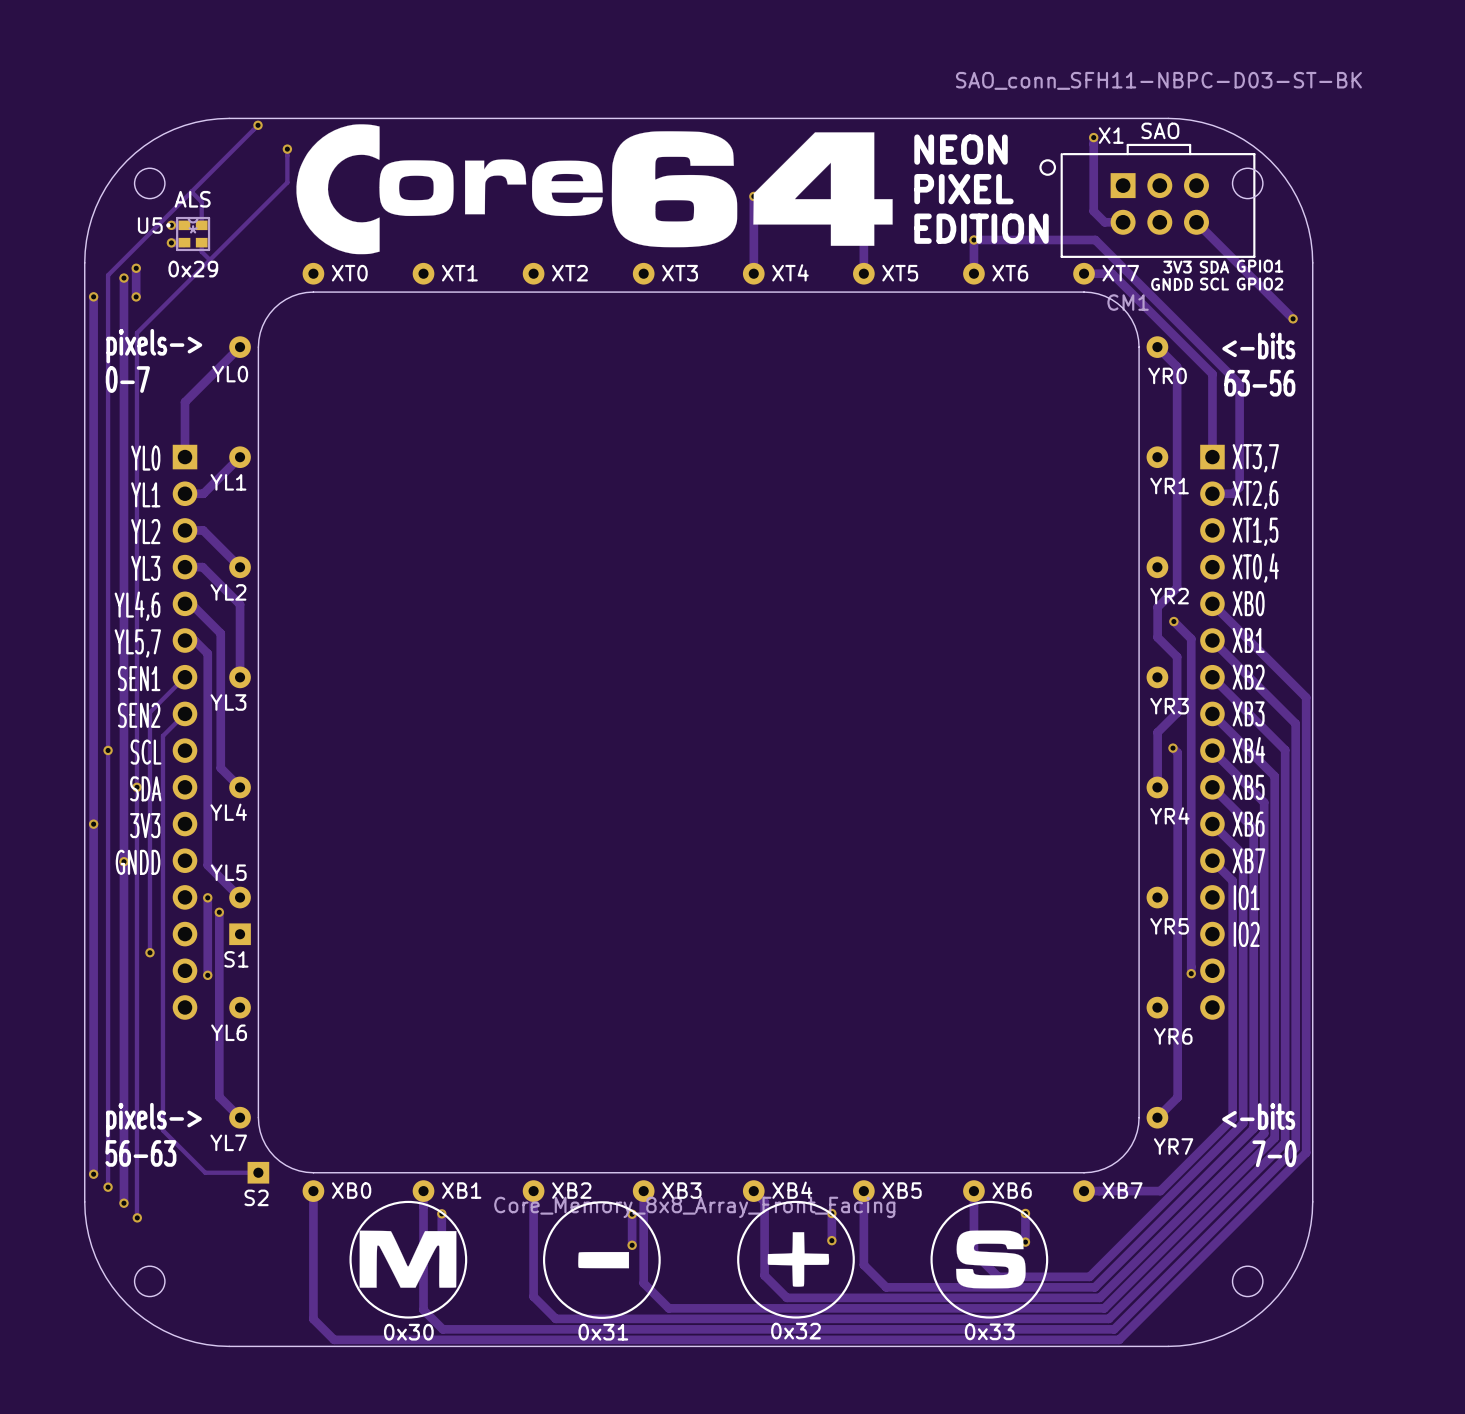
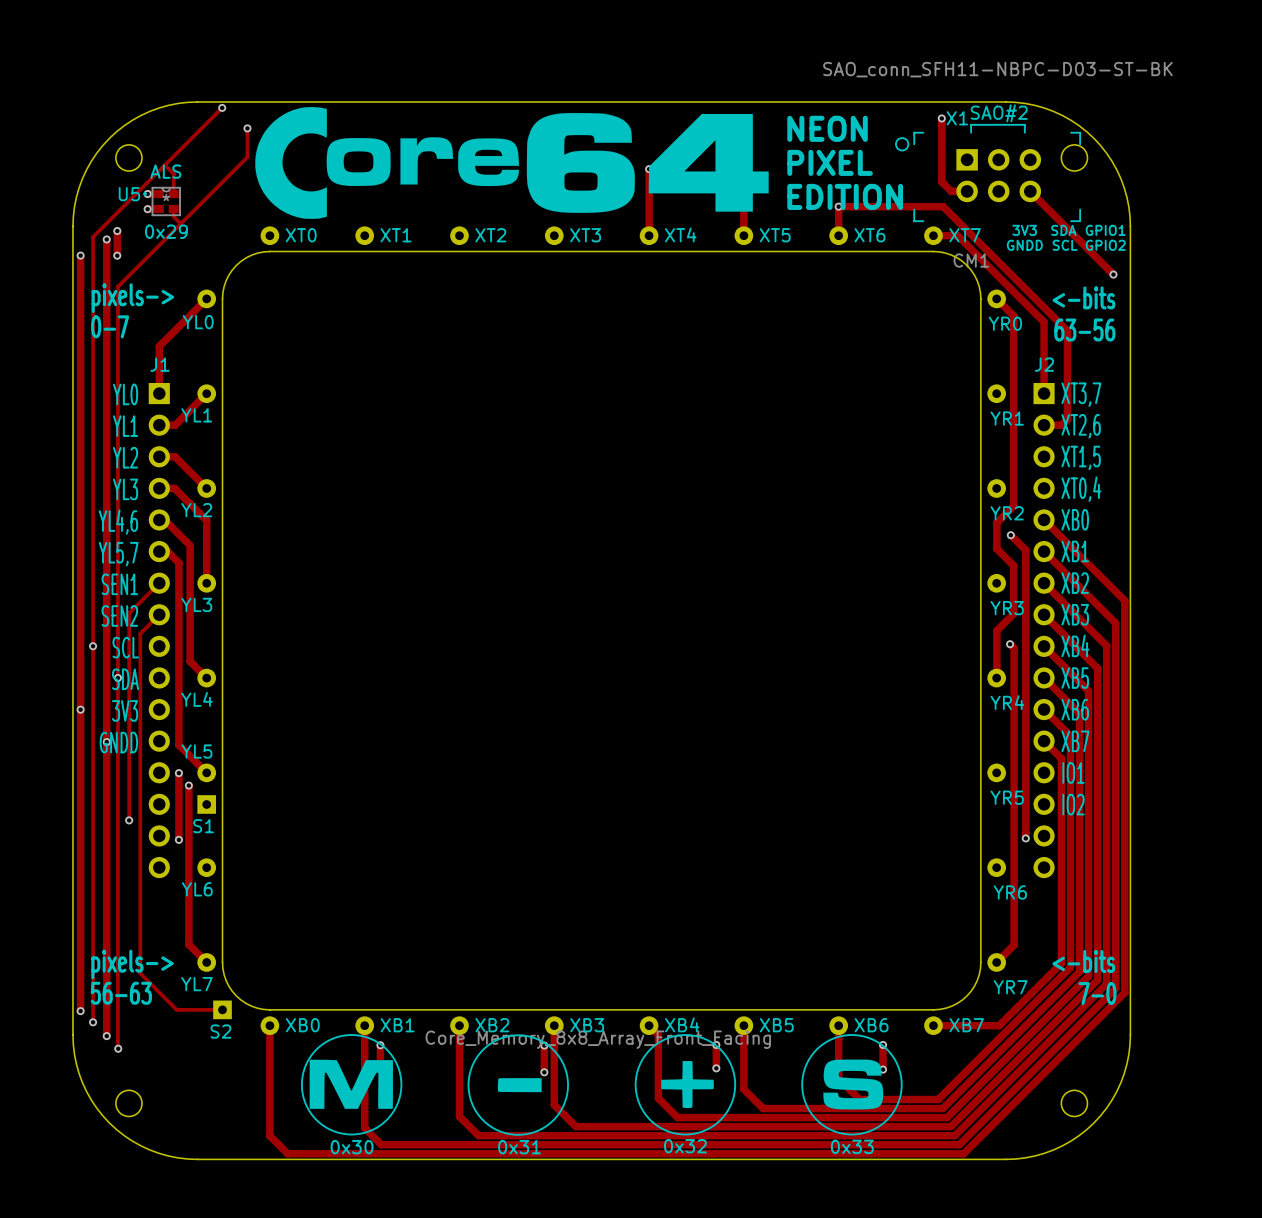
X1 footprint: [1039, 143, 1256, 258] -> [895, 123, 1082, 223]
drawing: none -> [1006, 224, 1126, 251]
text: none -> J1 (159, 364)
text: none -> J2 (1044, 364)

